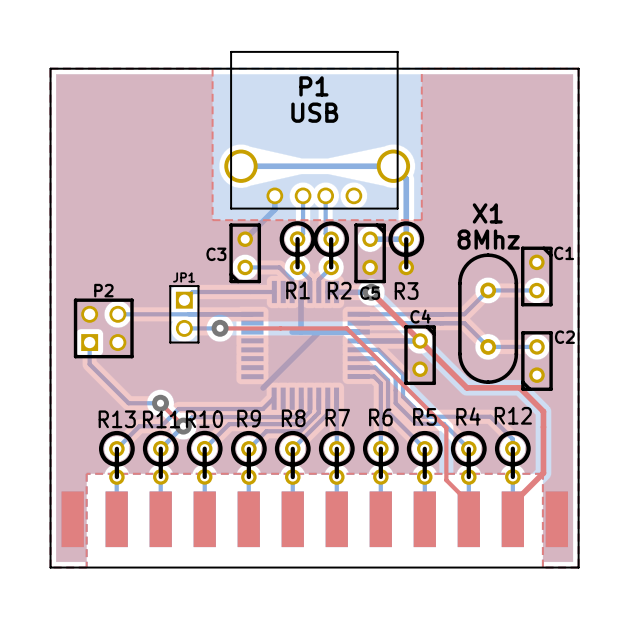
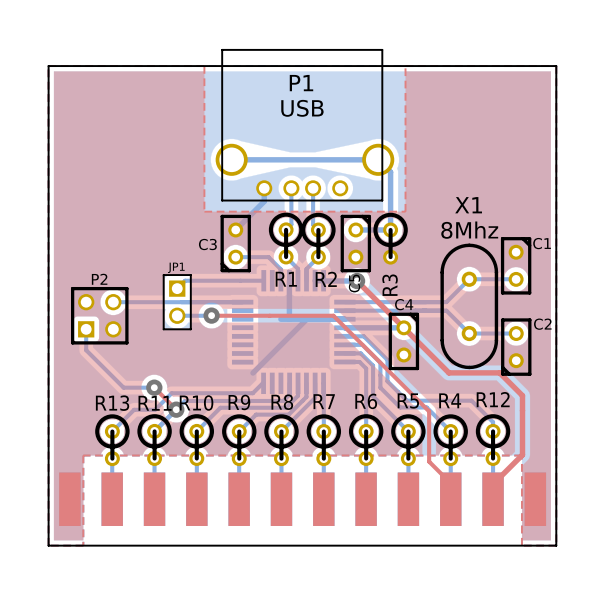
R3 name rotation: 0° (406, 291) -> 90° counterclockwise (390, 285)
C5 name rotation: 0° (370, 293) -> 90° counterclockwise (354, 283)

